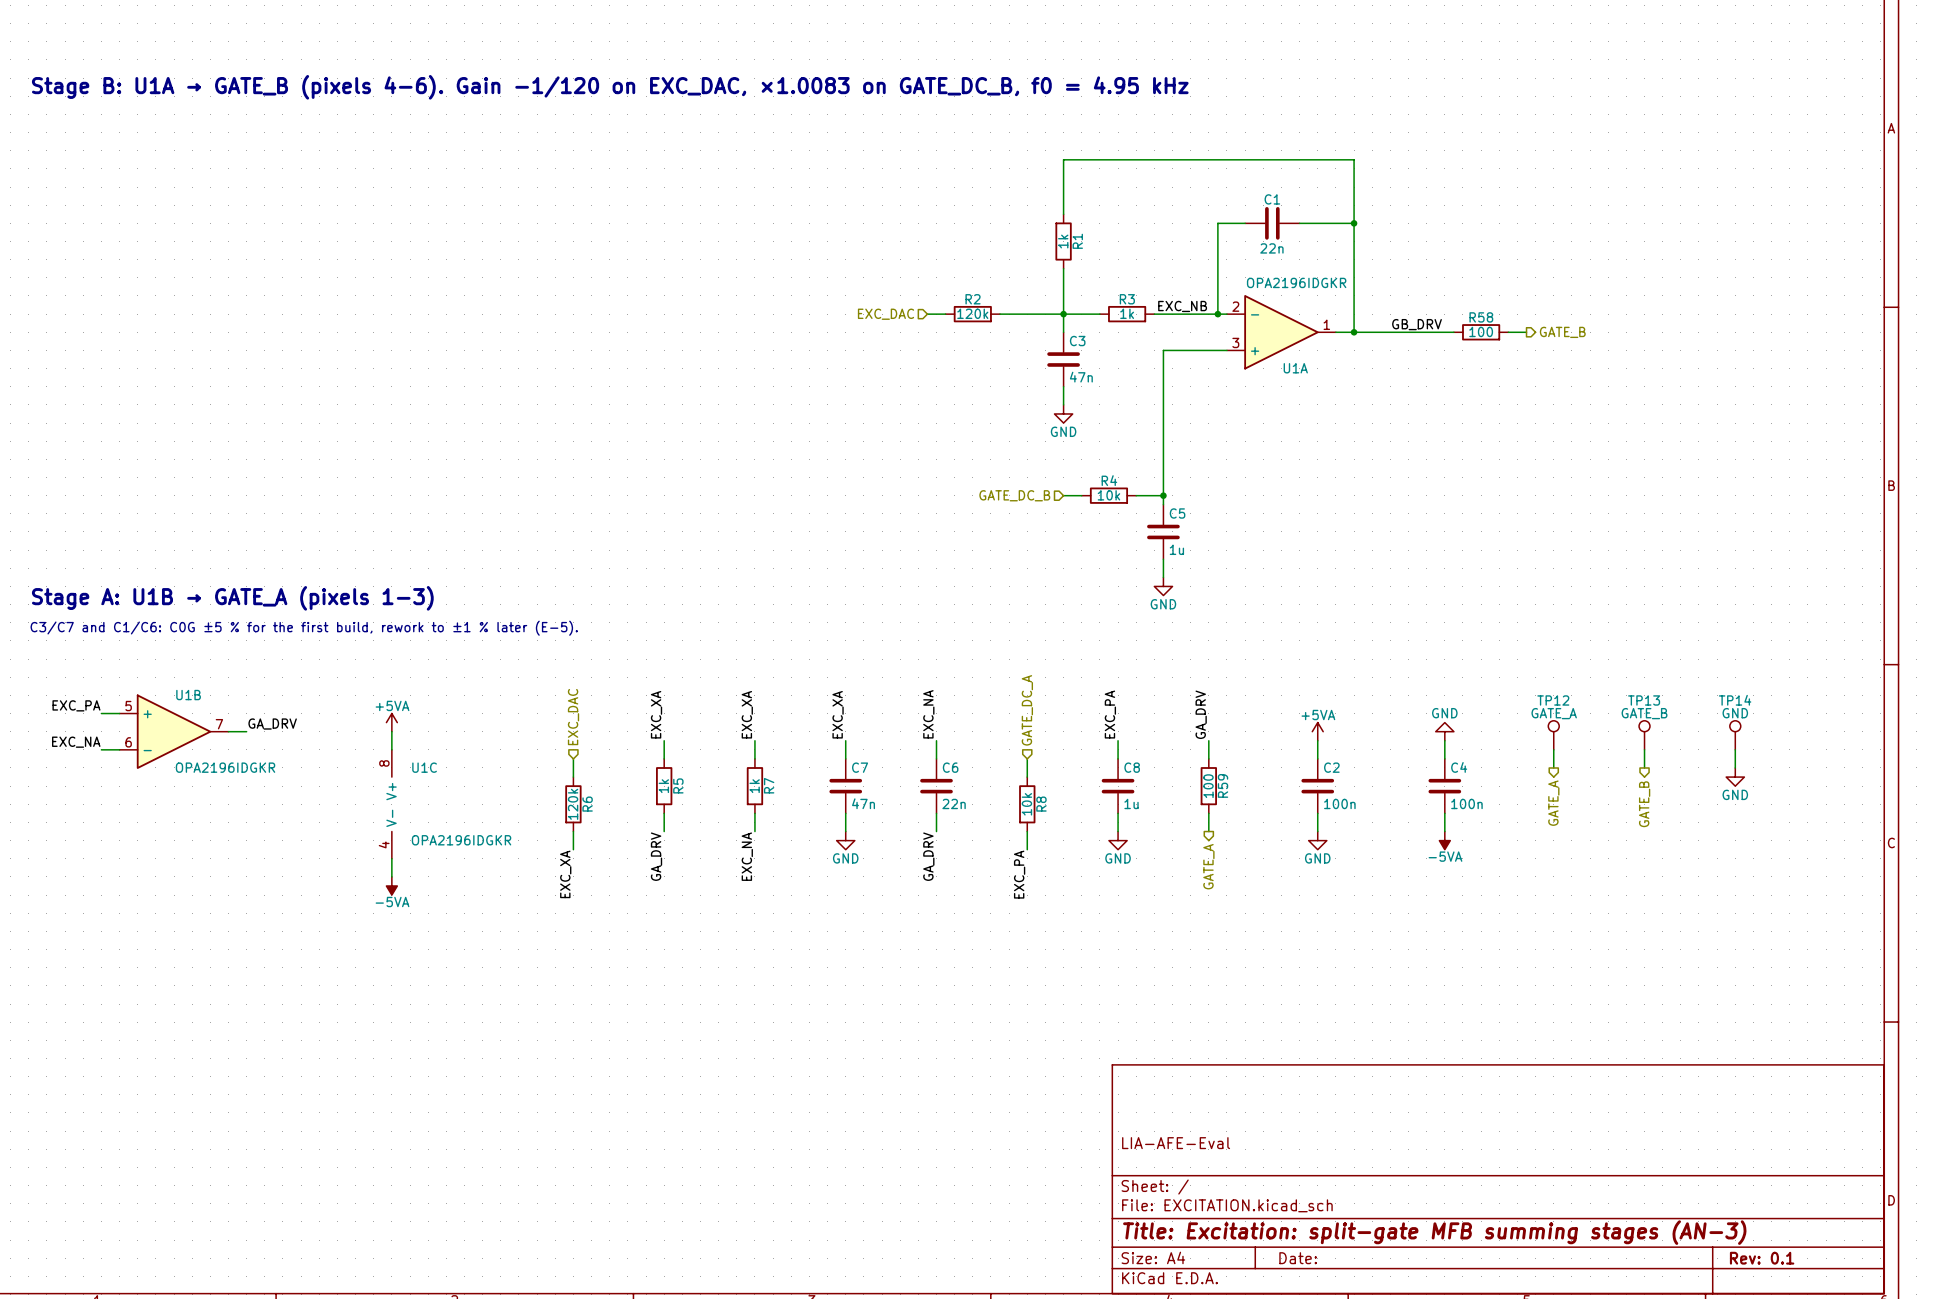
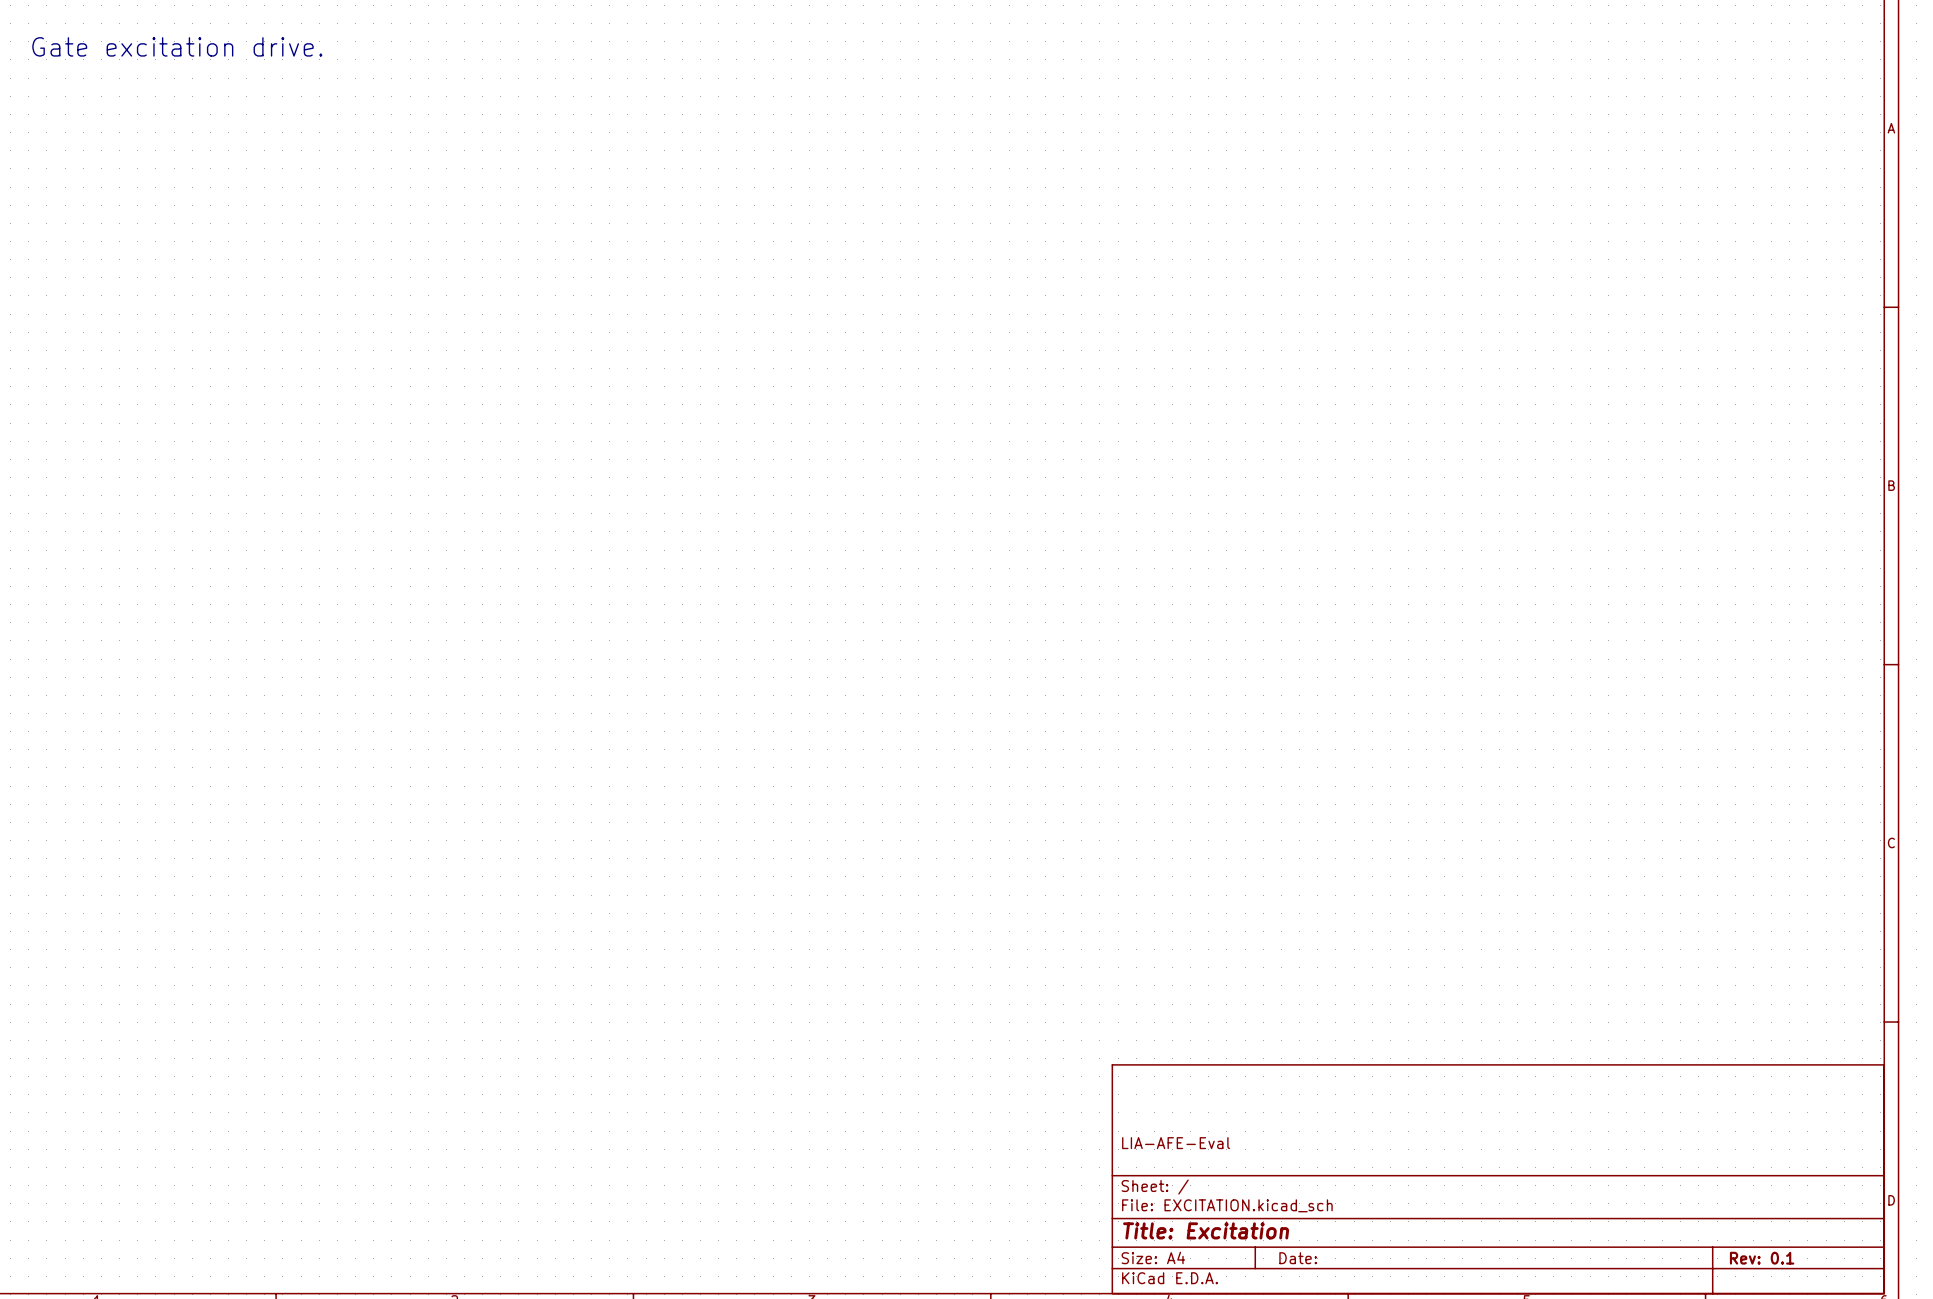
text: none -> Gate excitation drive. (177, 46)
text: Stage B: U1A → GATE_B (pixels 4-6). Gain -1/120 on EXC_DAC, ×1.0083 on GATE_DC_B, f0 = 4.95 kHz (610, 87) -> none
wire: (1063, 214) (1063, 159) (1354, 159) (1354, 332) -> none
wire: (1245, 223) (1217, 223) (1217, 314) -> none
C1: 22n (1272, 223) -> none
wire: (1299, 223) (1354, 223) -> none
junction: (1354, 223) -> none
R1: 1k (1063, 241) -> none
wire: (1063, 268) (1063, 332) -> none
label: EXC_NB (1182, 306) -> none
hierarchical label: EXC_DAC (886, 314) -> none
wire: (927, 314) (945, 314) -> none
R2: 120k (972, 314) -> none
wire: (1000, 314) (1099, 314) -> none
junction: (1063, 314) -> none
R3: 1k (1127, 314) -> none
wire: (1154, 314) (1226, 314) -> none
junction: (1217, 314) -> none
label: GB_DRV (1417, 324) -> none
U1A: OPA2196IDGKR (1281, 332) -> none
wire: (1335, 332) (1453, 332) -> none
junction: (1354, 332) -> none
R58: 100 (1481, 332) -> none
wire: (1508, 332) (1526, 332) -> none
hierarchical label: GATE_B (1562, 332) -> none
wire: (1226, 350) (1163, 350) (1163, 504) -> none
C3: 47n (1063, 359) -> none
wire: (1063, 386) (1063, 404) -> none
power symbol: GND (1063, 413) -> none
hierarchical label: GATE_DC_B (1014, 495) -> none
wire: (1063, 495) (1081, 495) -> none
R4: 10k (1108, 495) -> none
wire: (1136, 495) (1163, 495) -> none
junction: (1163, 495) -> none
C5: 1u (1163, 531) -> none
wire: (1163, 559) (1163, 577) -> none
power symbol: GND (1163, 586) -> none
text: Stage A: U1B → GATE_A (pixels 1-3) (232, 598) -> none
text: C3/C7 and C1/C6: C0G ±5 % for the first build, rework to ±1 % later (E-5). (304, 628) -> none
label: EXC_PA (76, 705) -> none
hierarchical label: GATE_DC_A (1027, 710) -> none
wire: (101, 713) (119, 713) -> none
label: EXC_XA (656, 714) -> none
label: EXC_XA (747, 714) -> none
label: EXC_XA (838, 714) -> none
label: EXC_NA (928, 714) -> none
label: EXC_PA (1110, 714) -> none
label: GA_DRV (1201, 714) -> none
hierarchical label: EXC_DAC (573, 717) -> none
power symbol: +5VA (391, 722) -> none
label: GA_DRV (272, 724) -> none
U1B: OPA2196IDGKR (174, 731) -> none
wire: (228, 731) (246, 731) -> none
wire: (391, 731) (391, 749) -> none
power symbol: +5VA (1317, 731) -> none
power symbol: GND (1444, 731) -> none
TP12: GATE_A (1553, 735) -> none
TP13: GATE_B (1644, 735) -> none
TP14: GND (1735, 735) -> none
wire: (664, 740) (664, 758) -> none
wire: (754, 740) (754, 758) -> none
wire: (845, 740) (845, 758) -> none
wire: (936, 740) (936, 758) -> none
wire: (1118, 740) (1118, 758) -> none
wire: (1208, 740) (1208, 758) -> none
wire: (1317, 740) (1317, 758) -> none
wire: (1444, 740) (1444, 758) -> none
label: EXC_NA (76, 742) -> none
wire: (101, 749) (119, 749) -> none
wire: (1553, 749) (1553, 767) -> none
wire: (1644, 749) (1644, 767) -> none
wire: (1735, 749) (1735, 767) -> none
wire: (573, 758) (573, 777) -> none
wire: (1027, 758) (1027, 777) -> none
power symbol: GND (1735, 777) -> none
R5: 1k (664, 786) -> none
R7: 1k (754, 786) -> none
C7: 47n (845, 786) -> none
C6: 22n (936, 786) -> none
C8: 1u (1118, 786) -> none
R59: 100 (1208, 786) -> none
C2: 100n (1317, 786) -> none
C4: 100n (1444, 786) -> none
hierarchical label: GATE_A (1553, 803) -> none
U1C: OPA2196IDGKR (391, 804) -> none
R6: 120k (573, 804) -> none
R8: 10k (1027, 804) -> none
hierarchical label: GATE_B (1644, 804) -> none
wire: (664, 813) (664, 831) -> none
wire: (754, 813) (754, 831) -> none
wire: (845, 813) (845, 831) -> none
wire: (936, 813) (936, 831) -> none
wire: (1118, 813) (1118, 831) -> none
wire: (1208, 813) (1208, 831) -> none
wire: (1317, 813) (1317, 831) -> none
wire: (1444, 813) (1444, 831) -> none
wire: (573, 831) (573, 849) -> none
wire: (1027, 831) (1027, 849) -> none
power symbol: GND (845, 840) -> none
power symbol: GND (1118, 840) -> none
power symbol: GND (1317, 840) -> none
power symbol: -5VA (1444, 840) -> none
label: GA_DRV (656, 856) -> none
label: EXC_NA (747, 856) -> none
label: GA_DRV (928, 856) -> none
wire: (391, 858) (391, 876) -> none
hierarchical label: GATE_A (1208, 866) -> none
label: EXC_XA (565, 874) -> none
label: EXC_PA (1019, 874) -> none
power symbol: -5VA (391, 886) -> none
title block: Title: Excitation: split-gate MFB summing stages (AN-3) (1434, 1232) -> Title: Excitation (1206, 1230)

